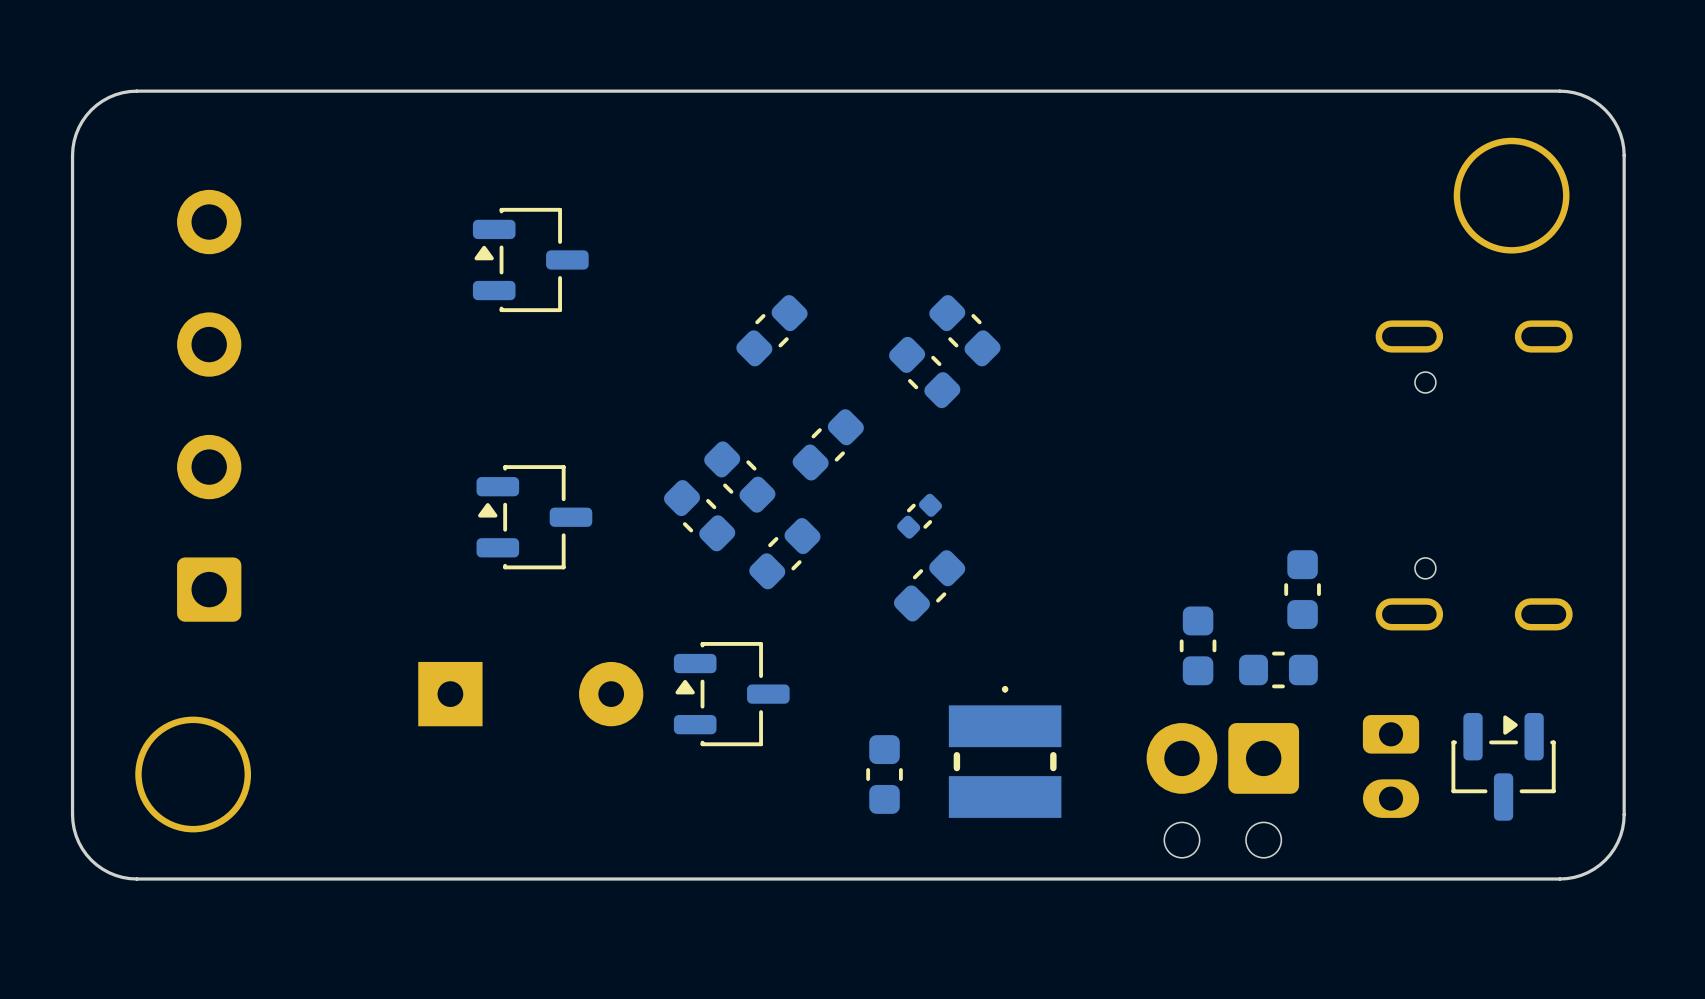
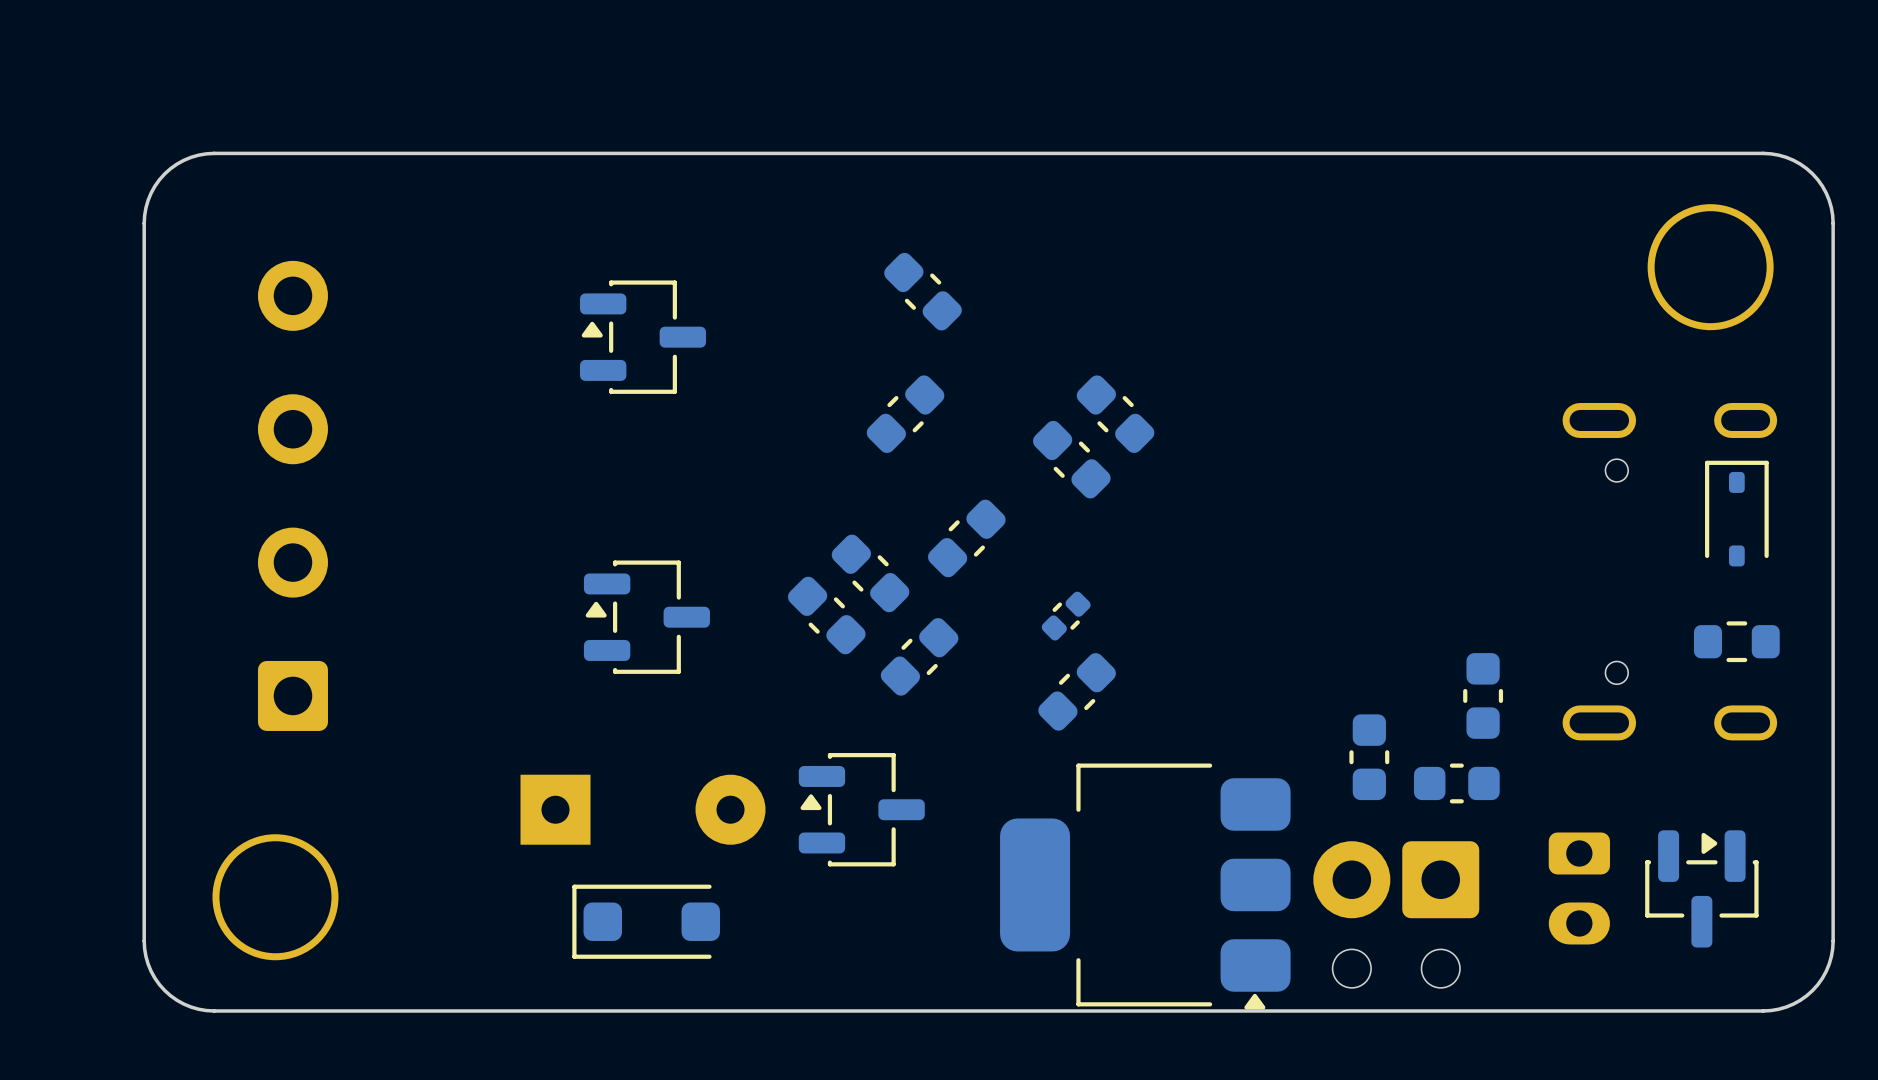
part: none -> (923, 291)
part: none -> (1736, 513)
part: none -> (1736, 641)
part footprint: [948, 686, 1062, 818] -> [1000, 763, 1291, 1010]
part: (884, 774) -> none
part: none -> (646, 921)

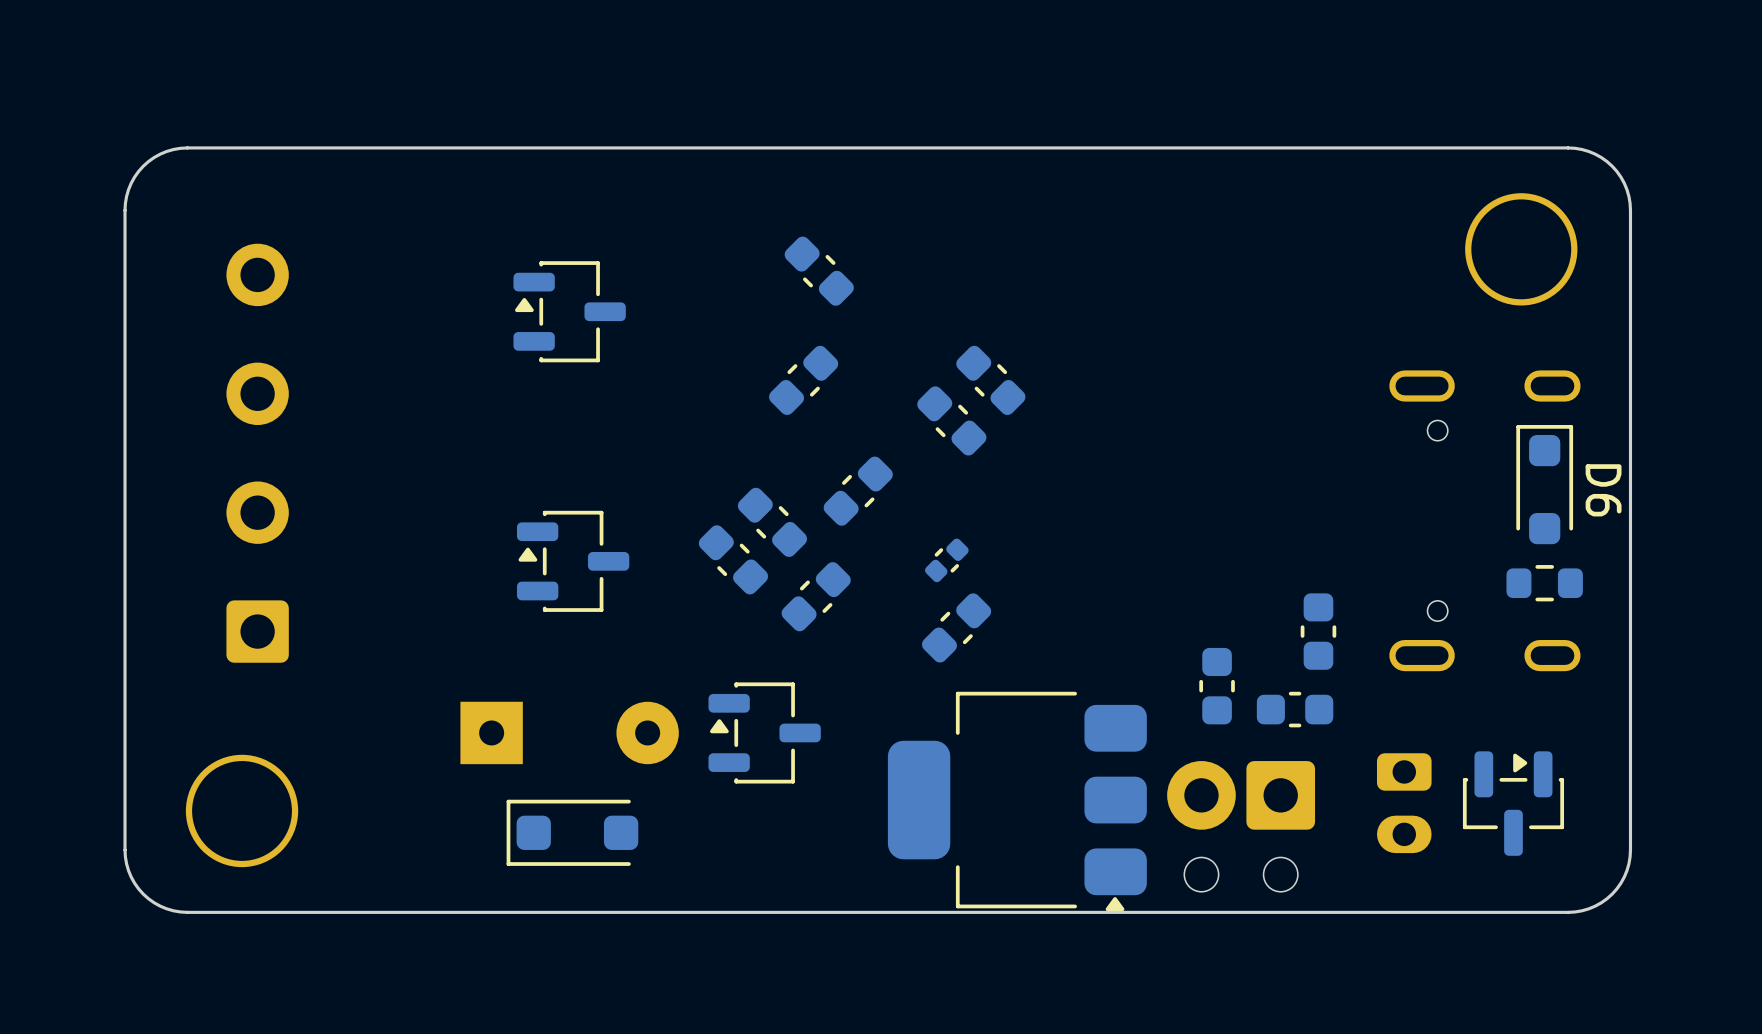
part: (1736, 513) -> none
D6: none -> (1544, 484)

